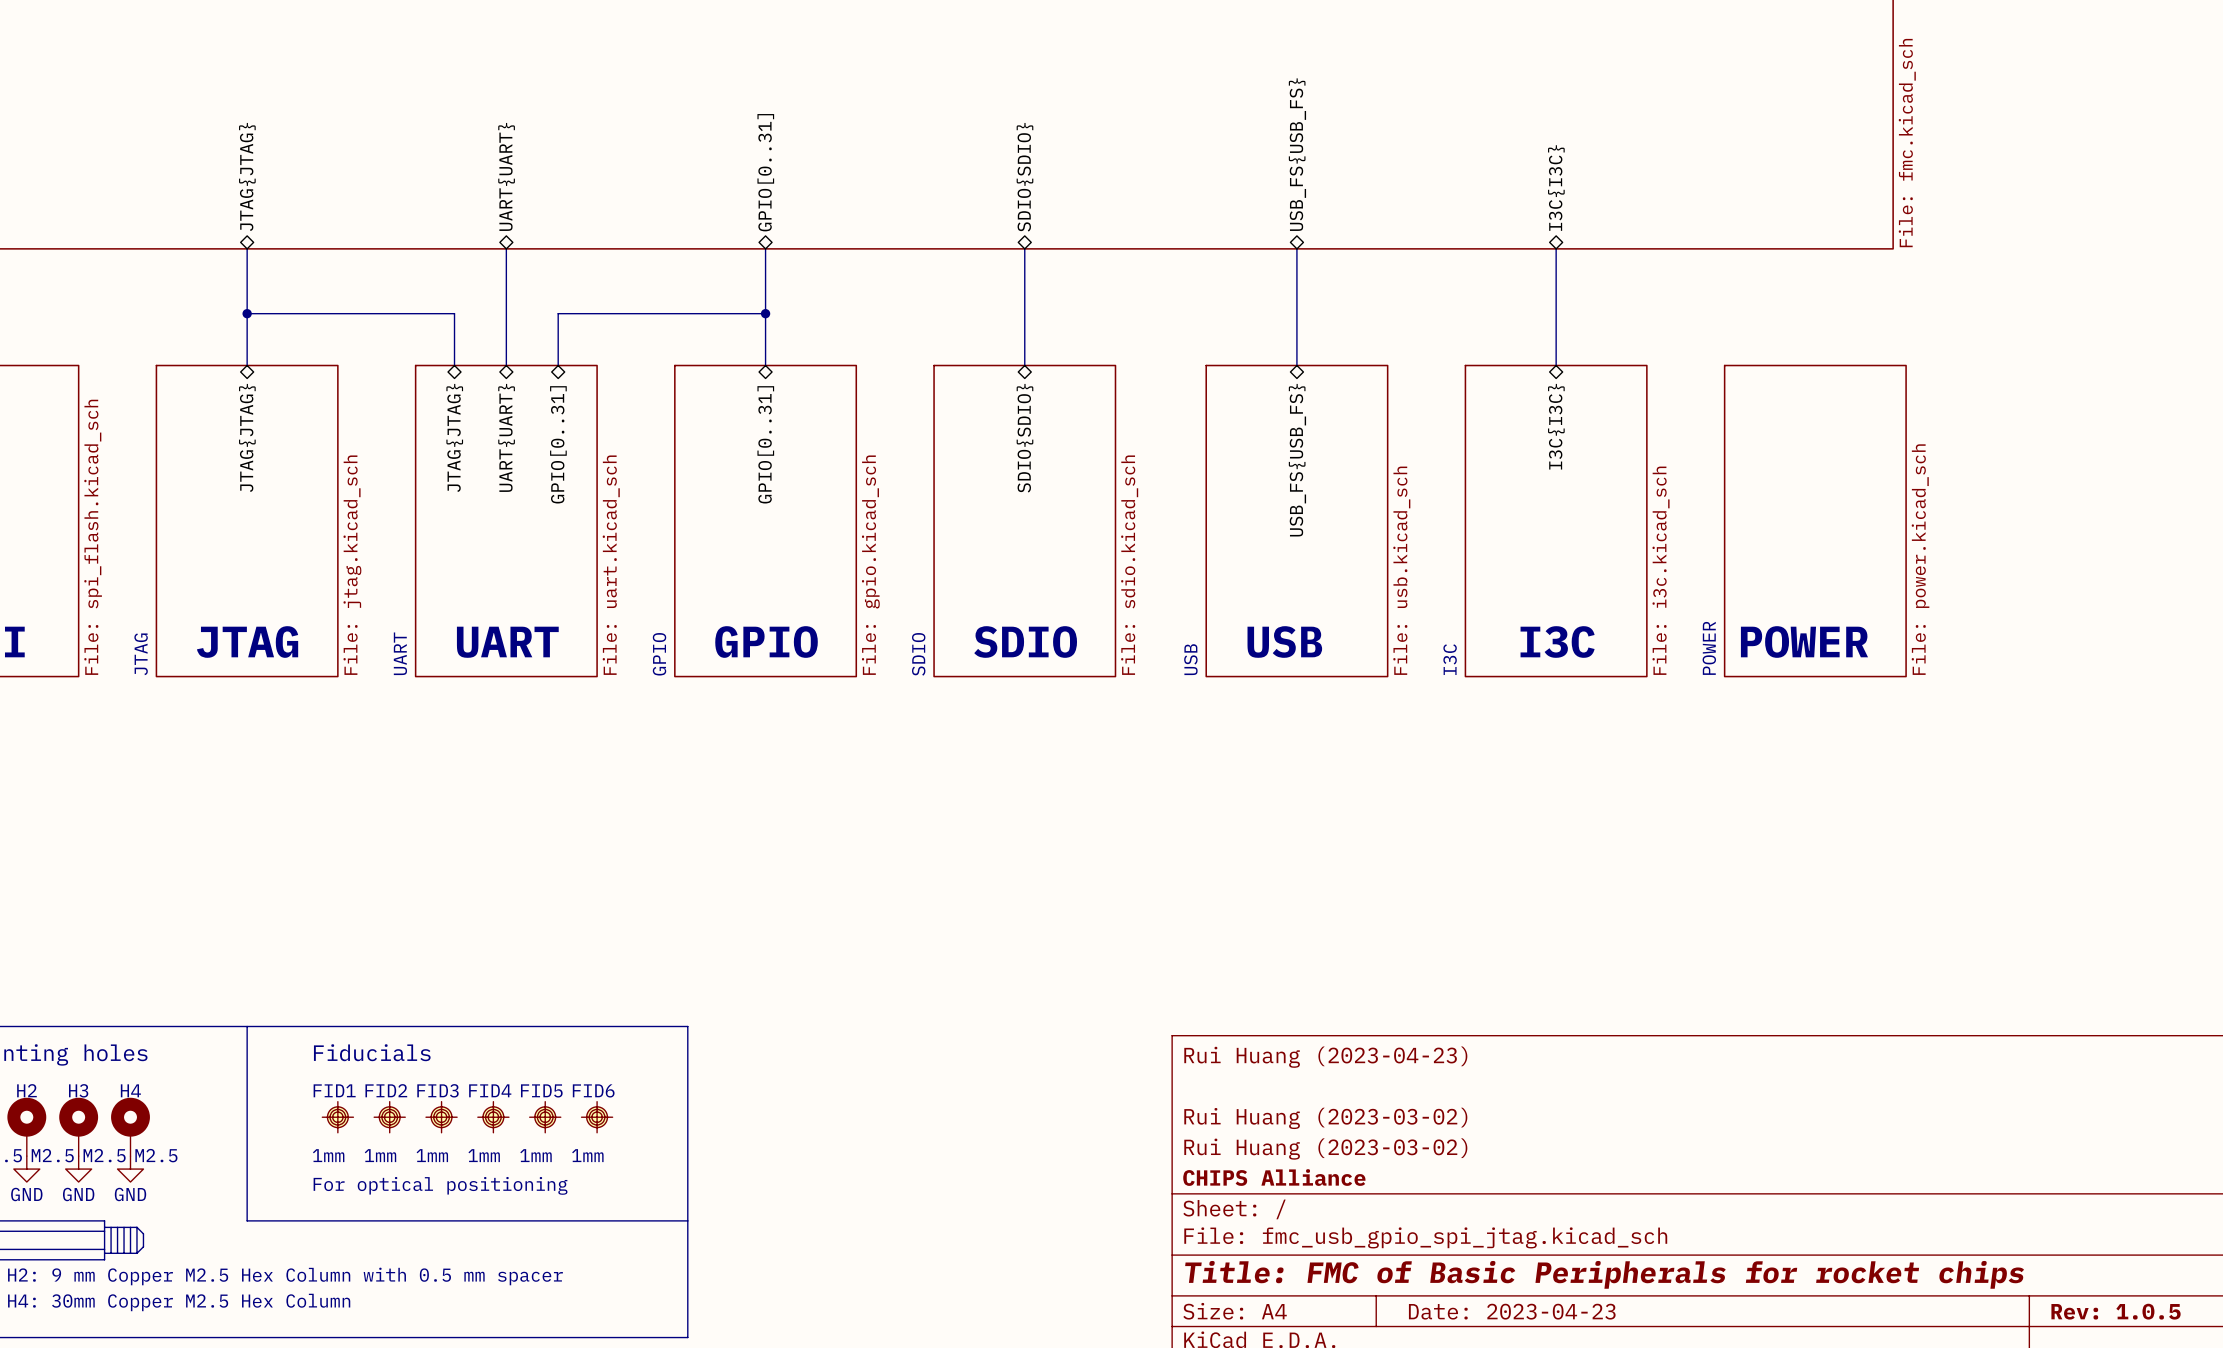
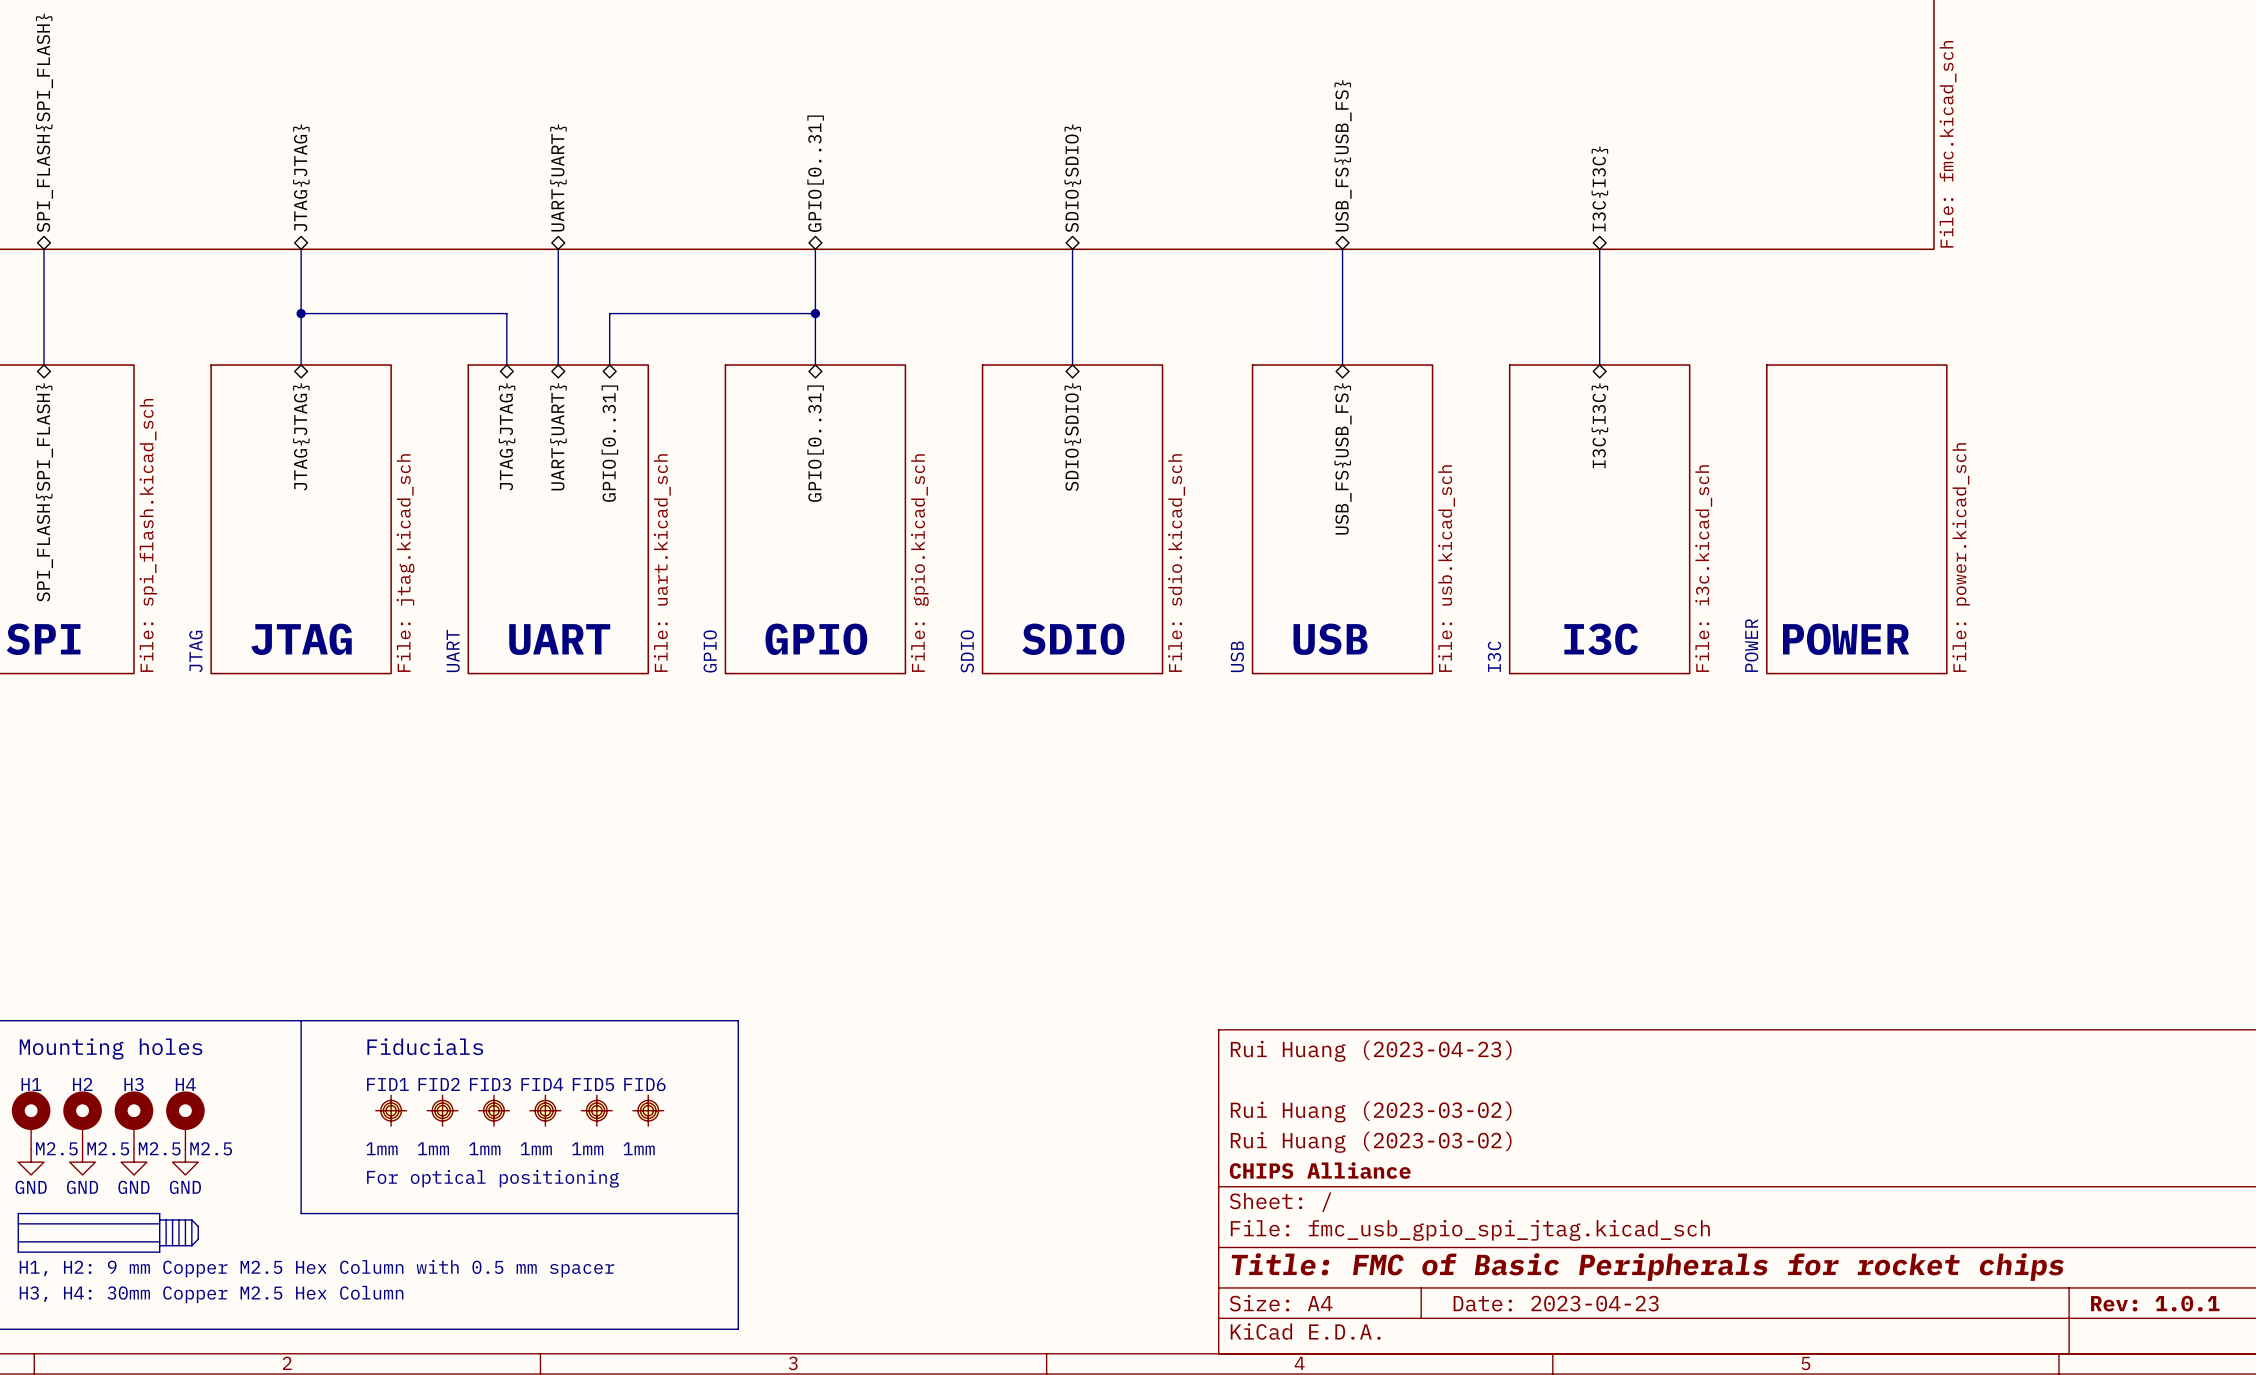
title block: Rev: 1.0.5 (2116, 1311) -> Rev: 1.0.1 (2155, 1303)

